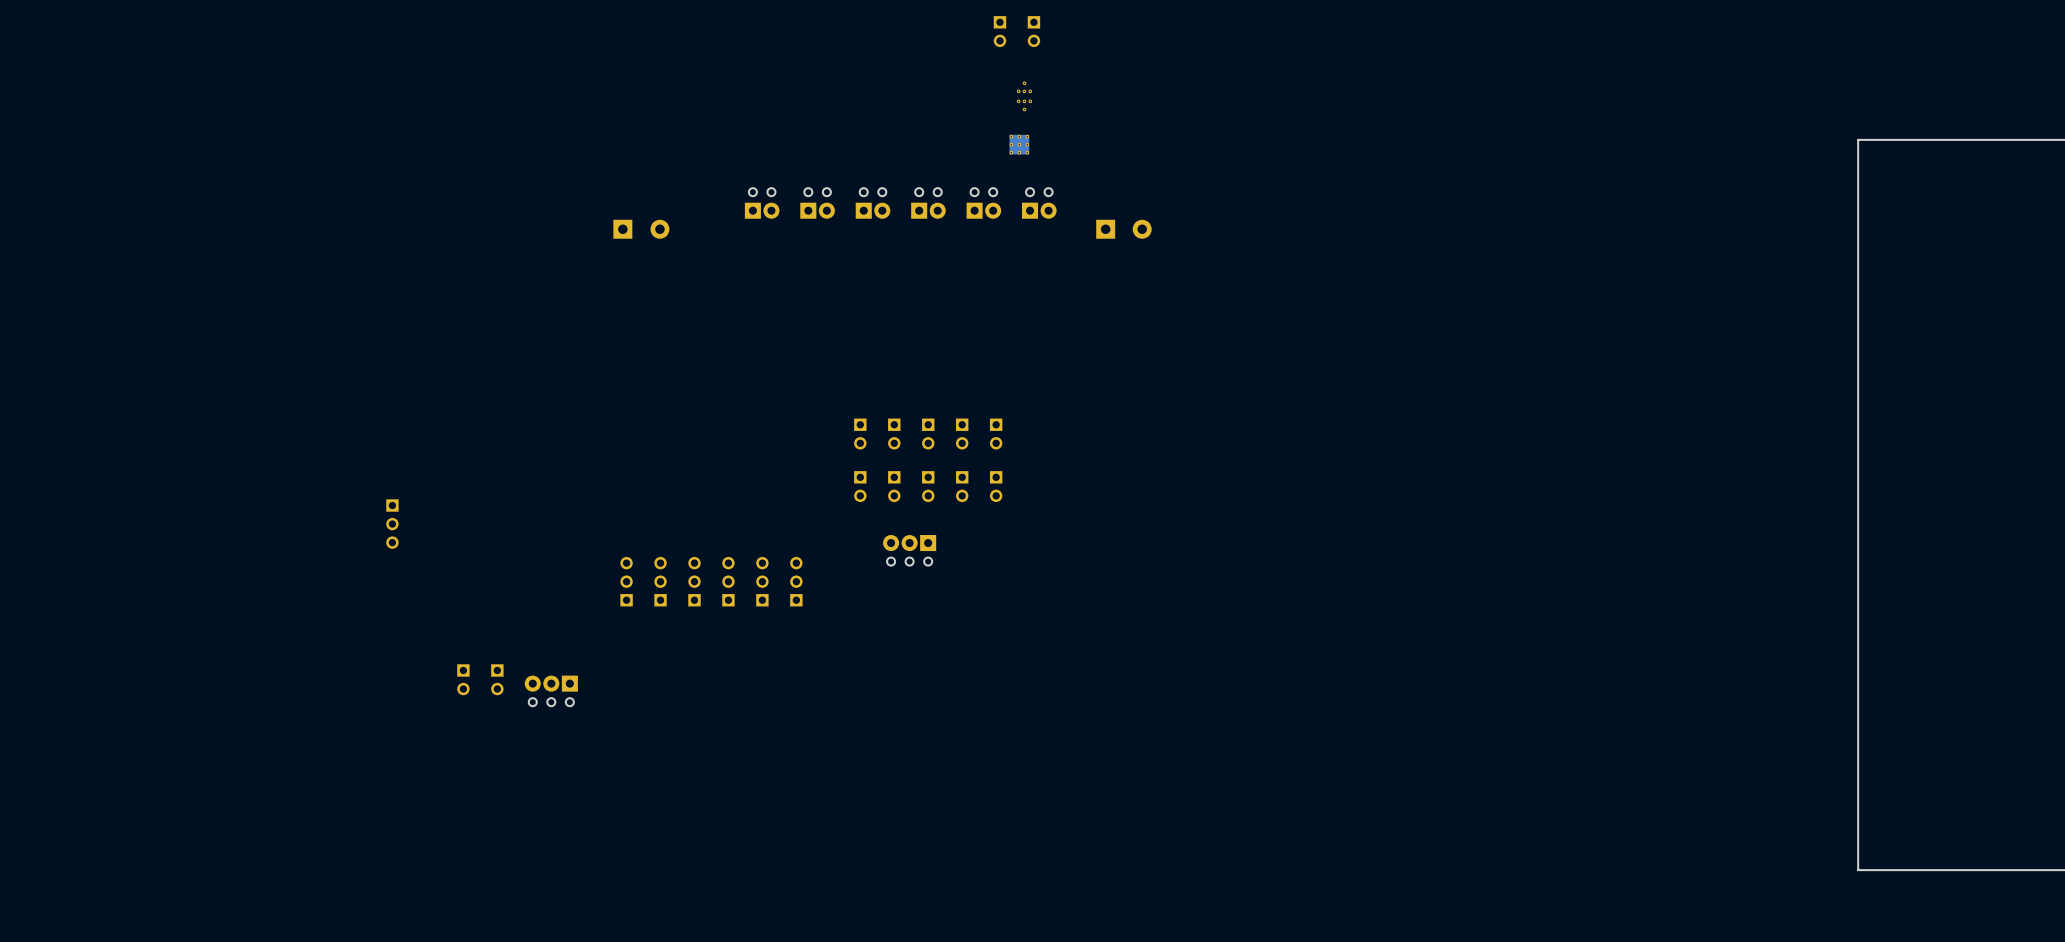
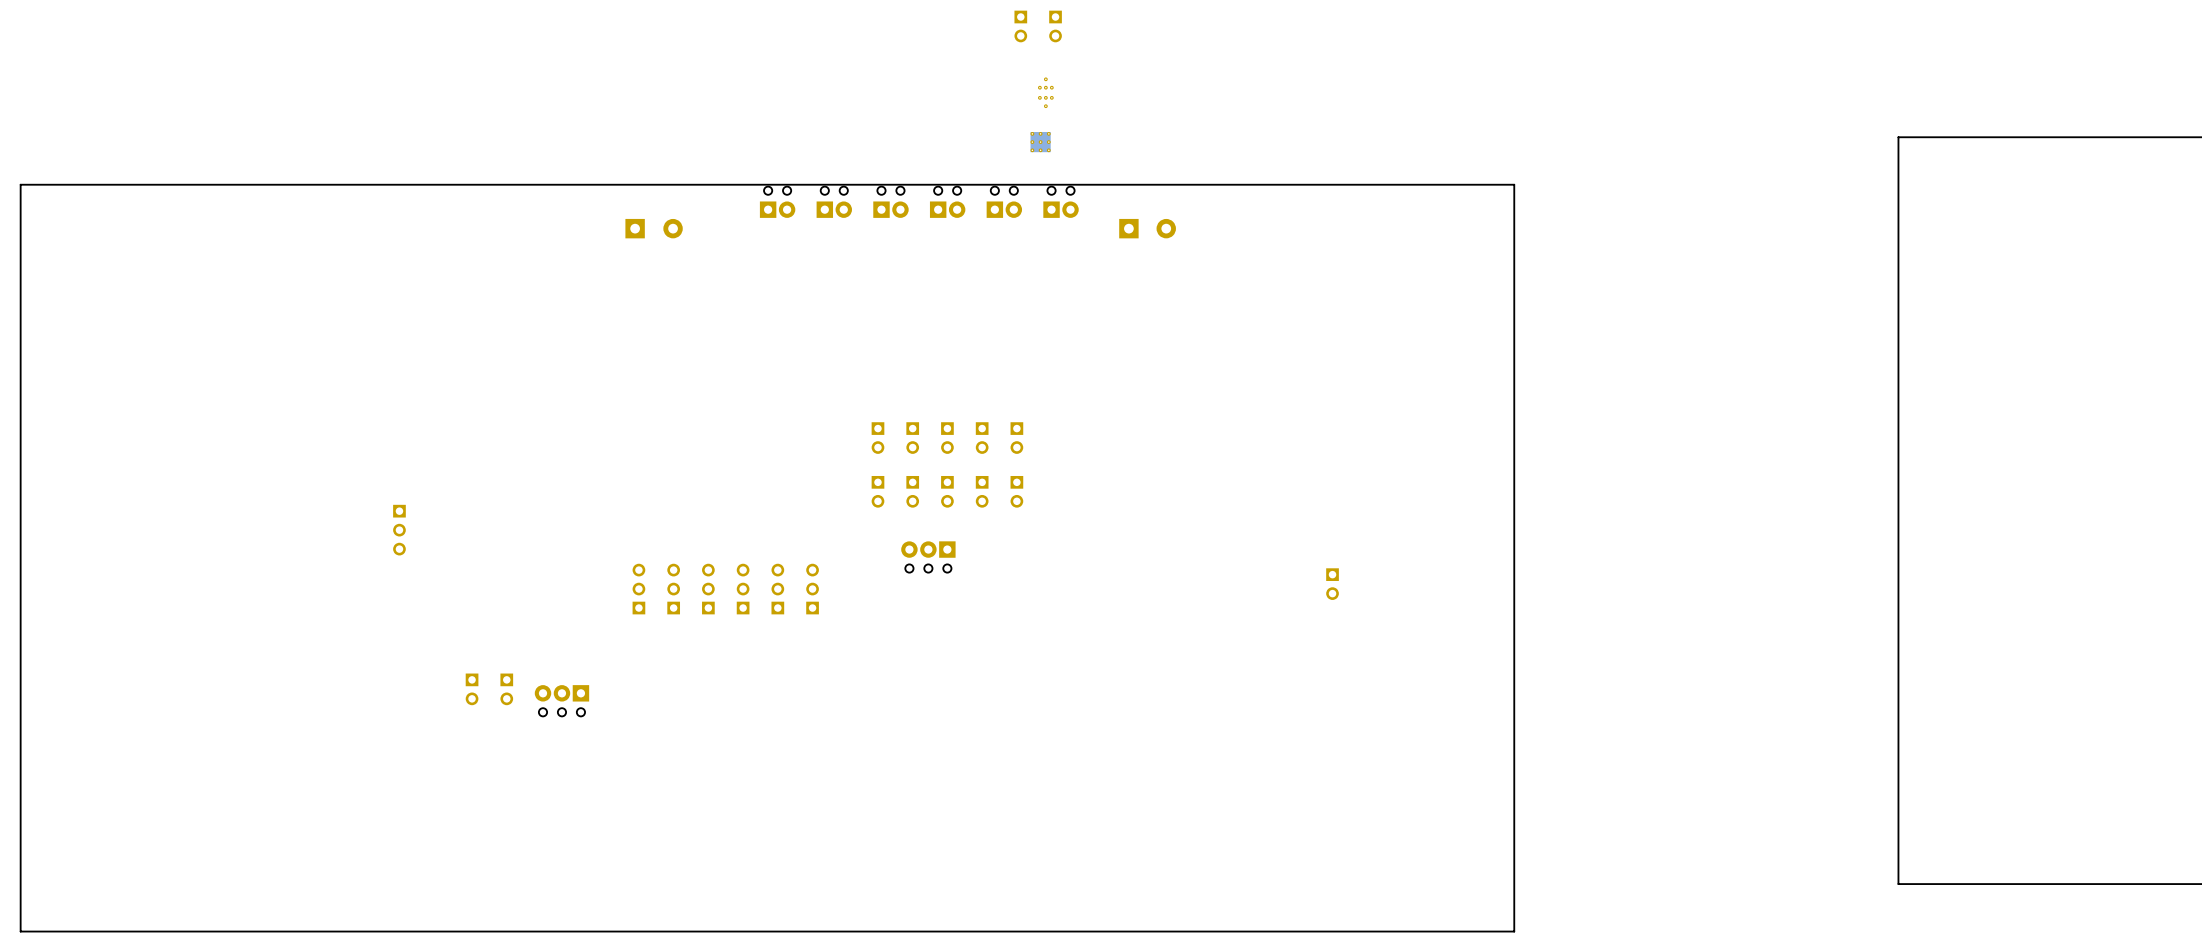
board edge: none -> (1514, 184) (20, 184) (20, 931) (1514, 931) (1514, 184)
part: none -> (1332, 584)

